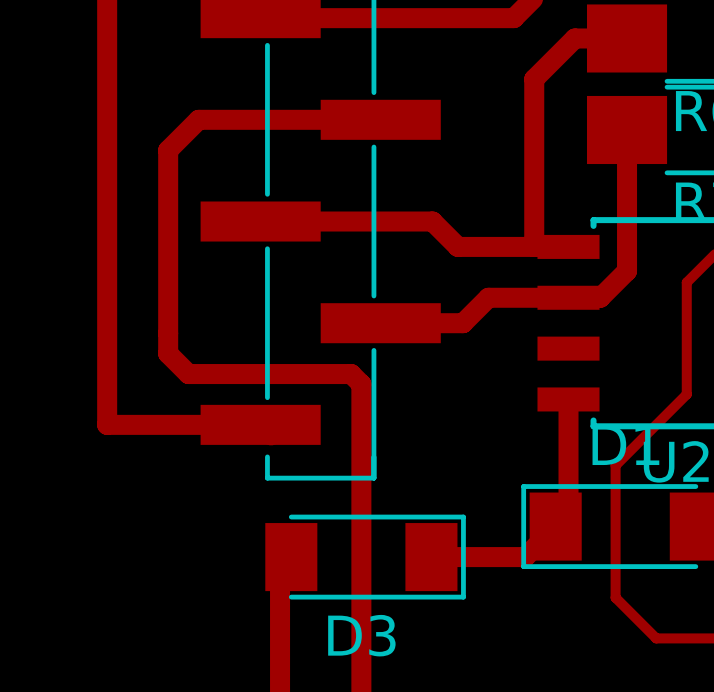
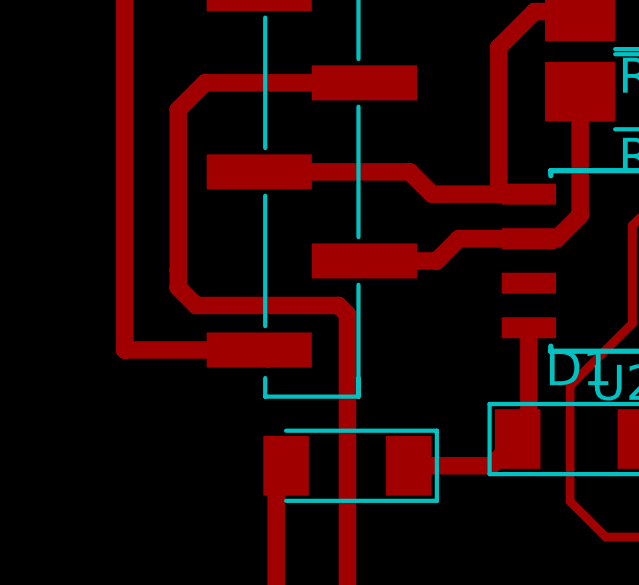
D3 name: D3 (361, 635) -> none

